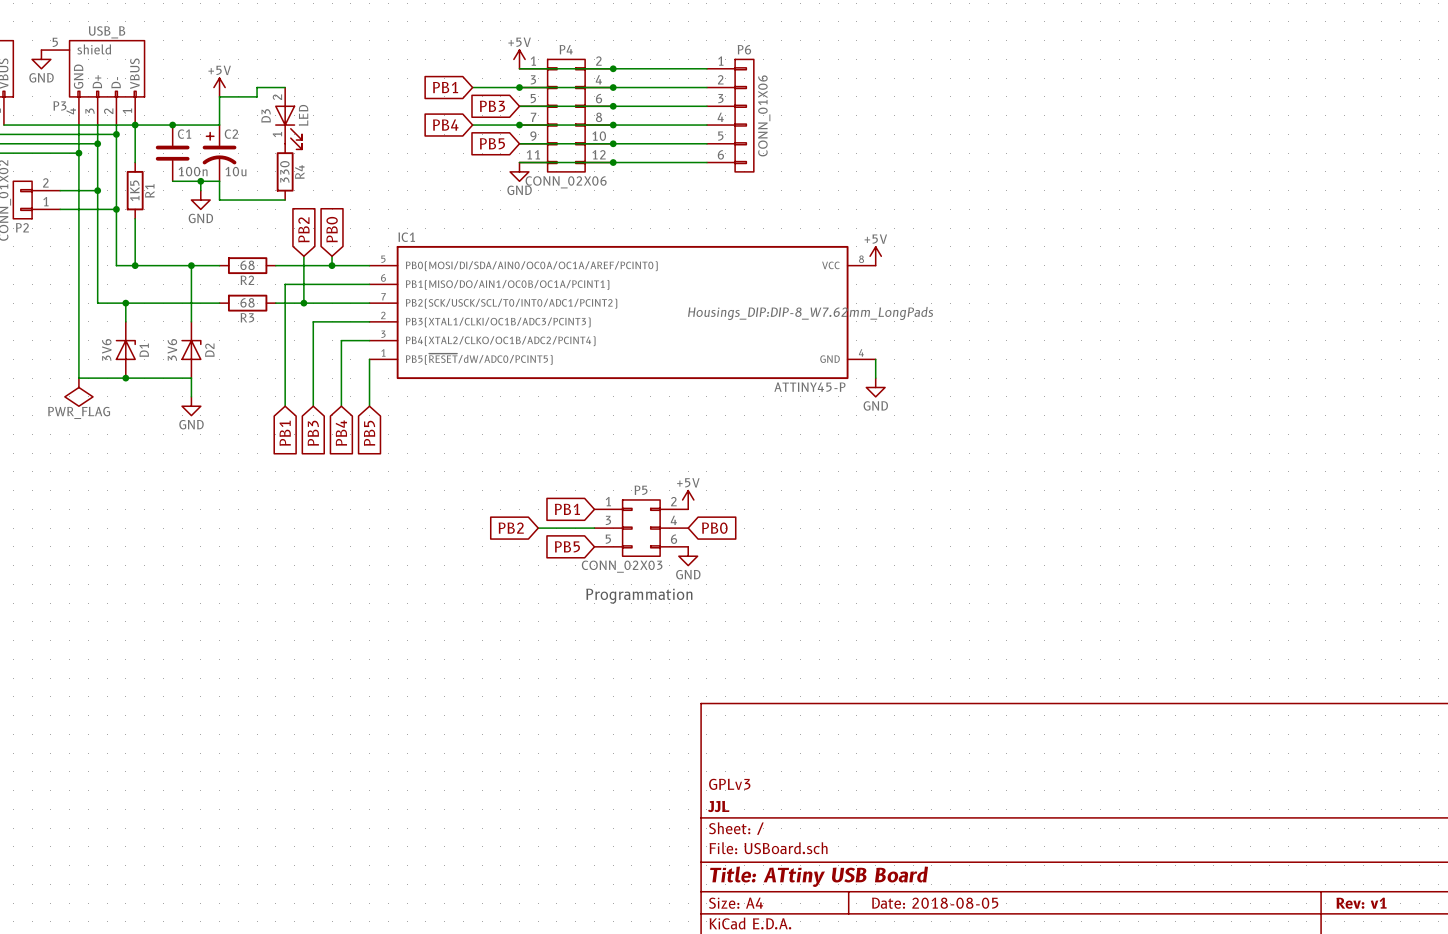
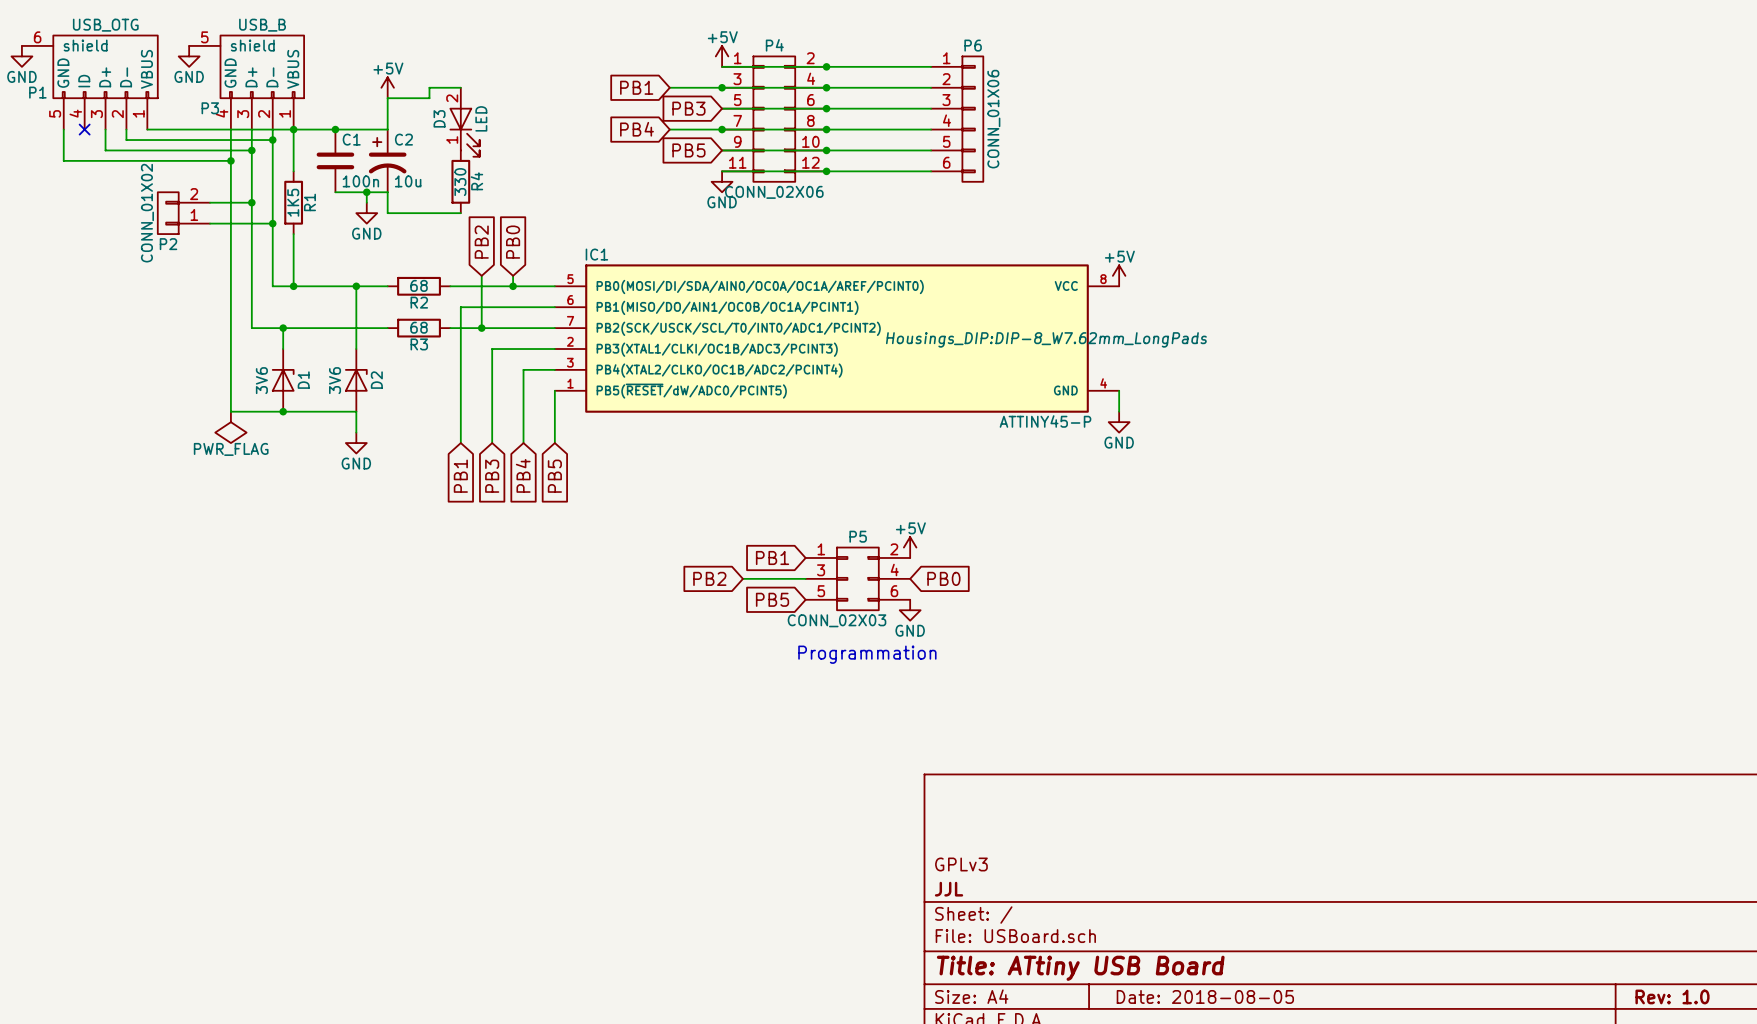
title block: Rev: v1 (1361, 903) -> Rev: 1.0 (1672, 996)

